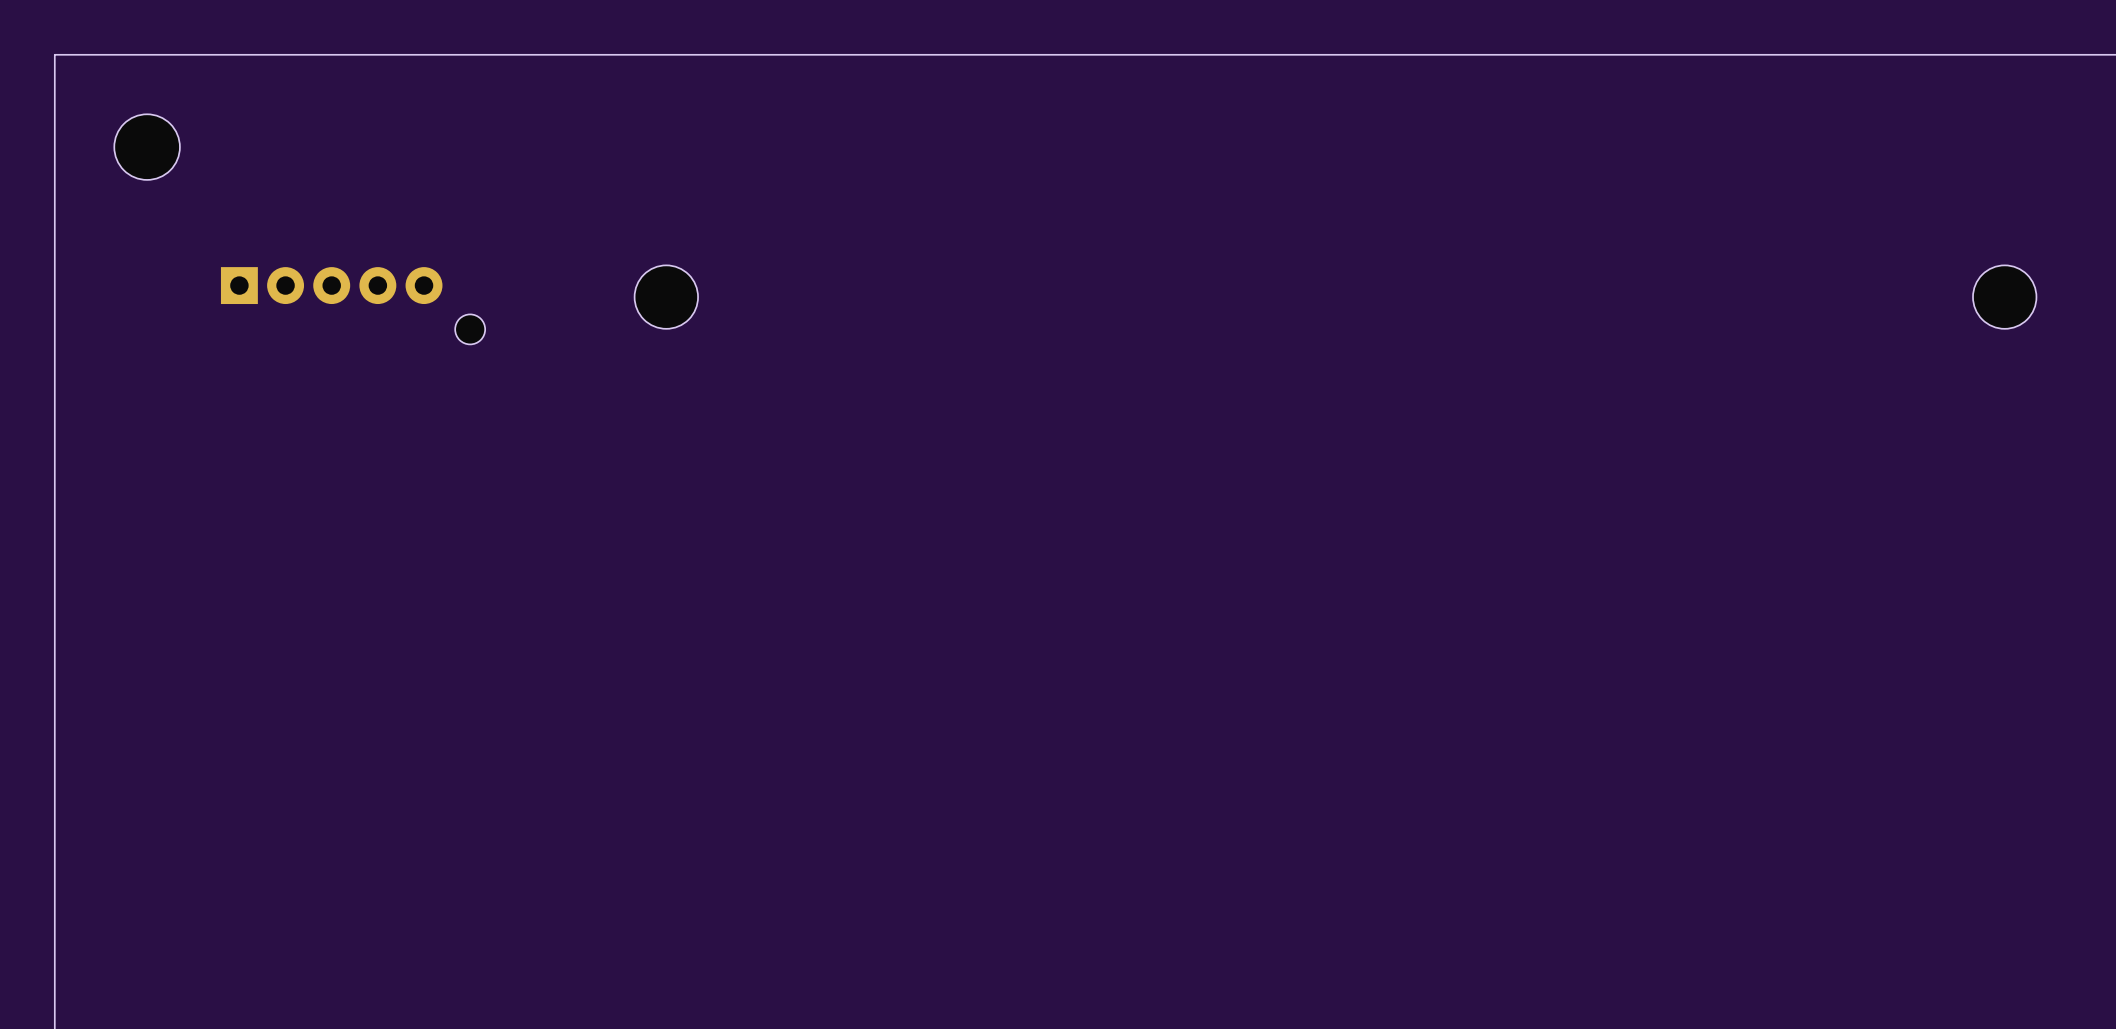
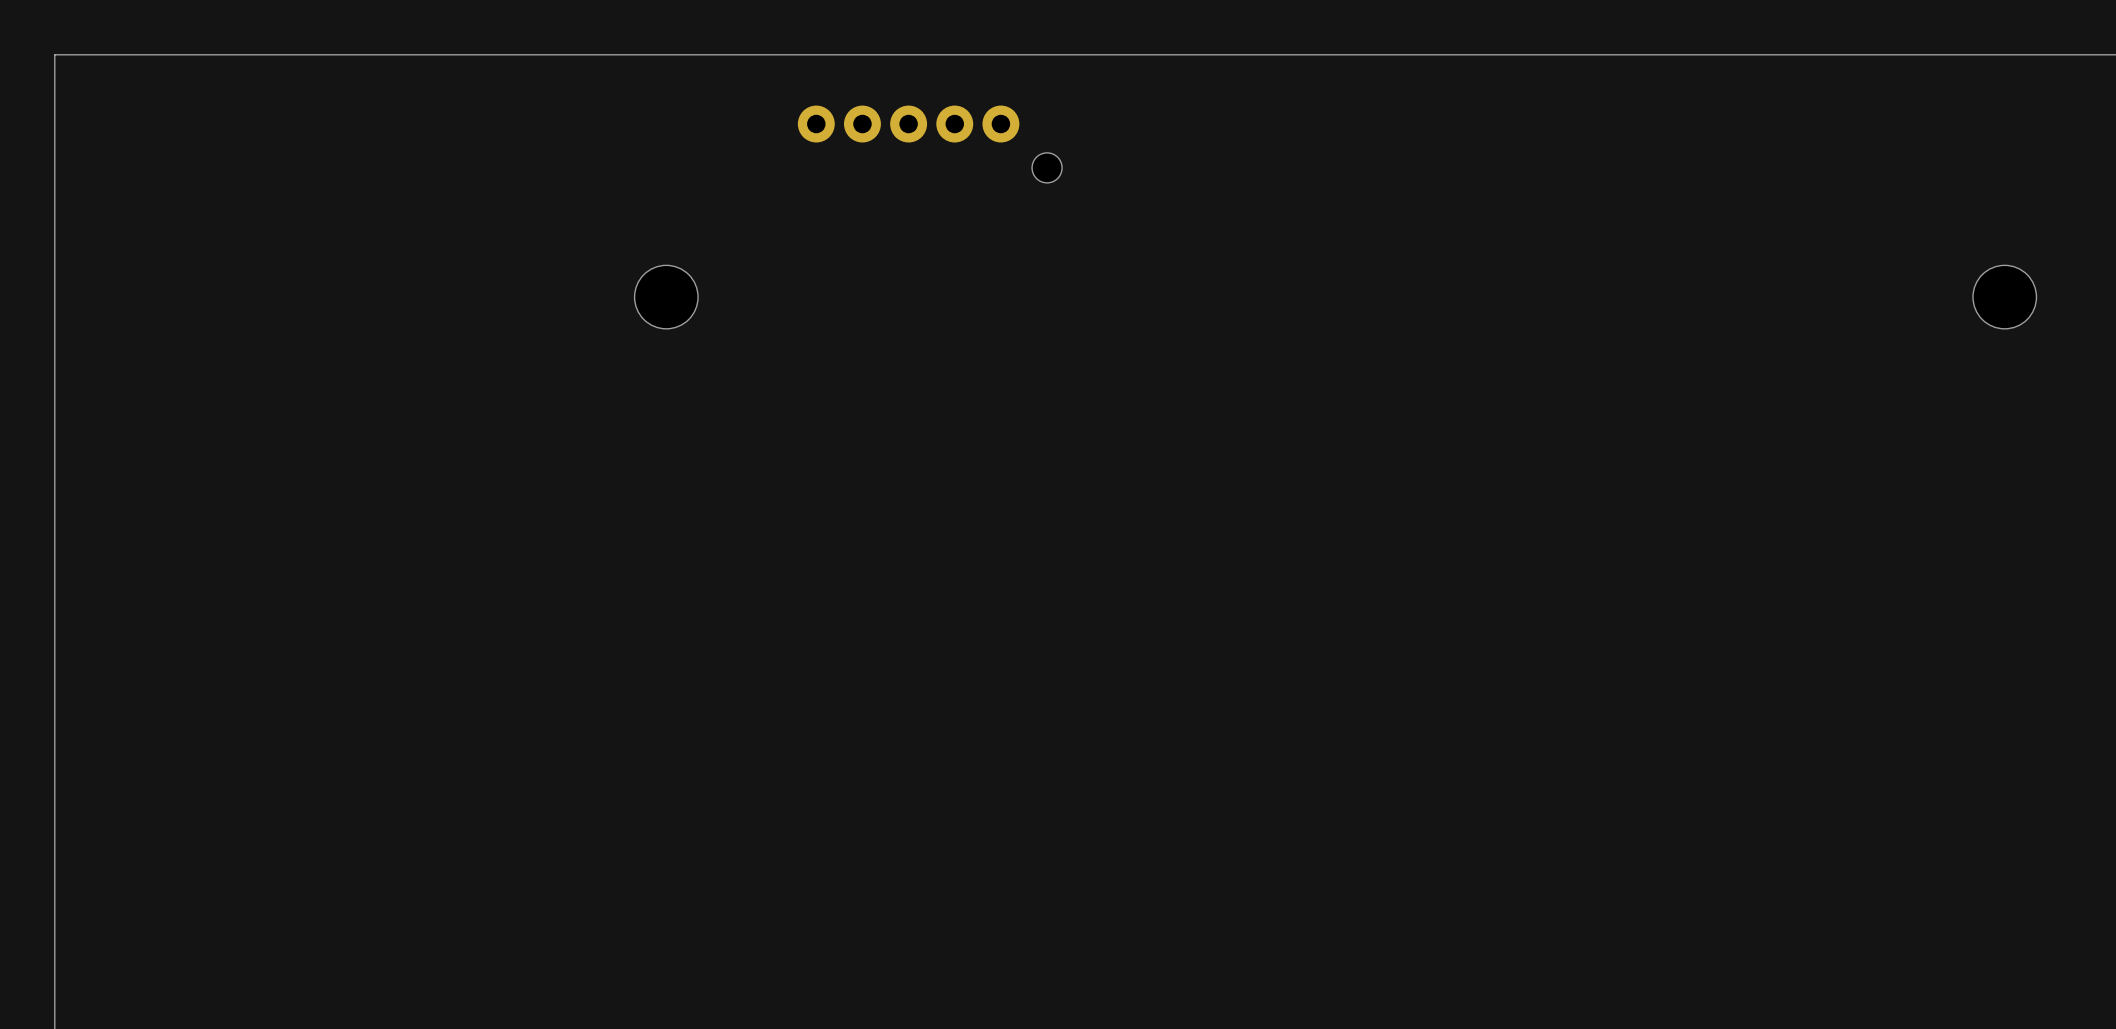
part: none -> (929, 144)
hole: (147, 147) -> none
part: (353, 305) -> none

